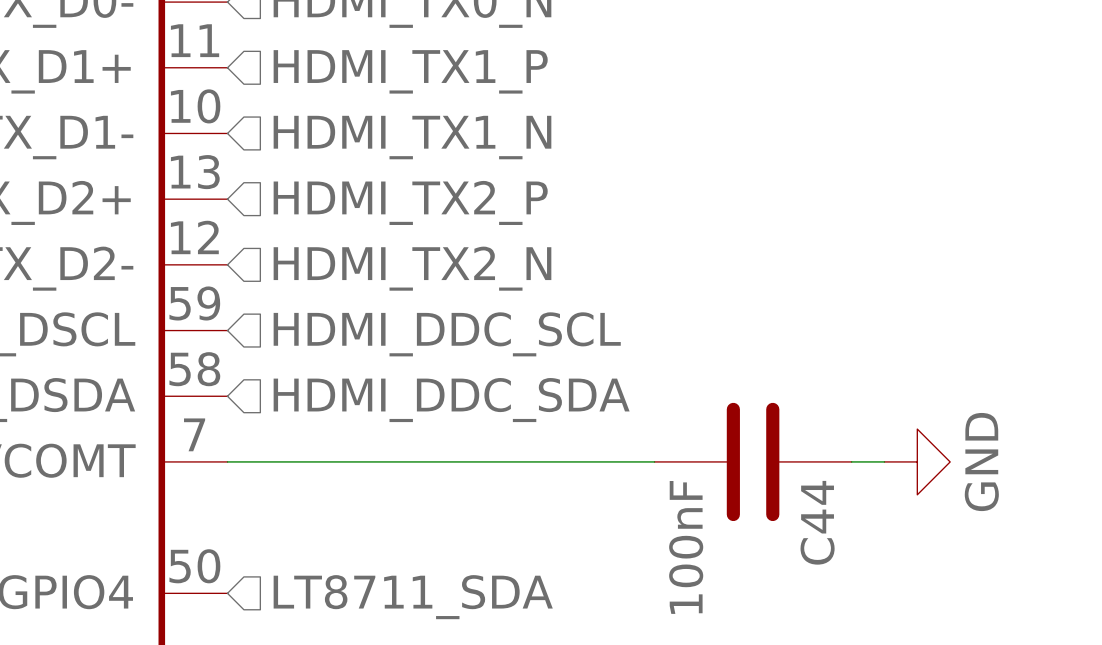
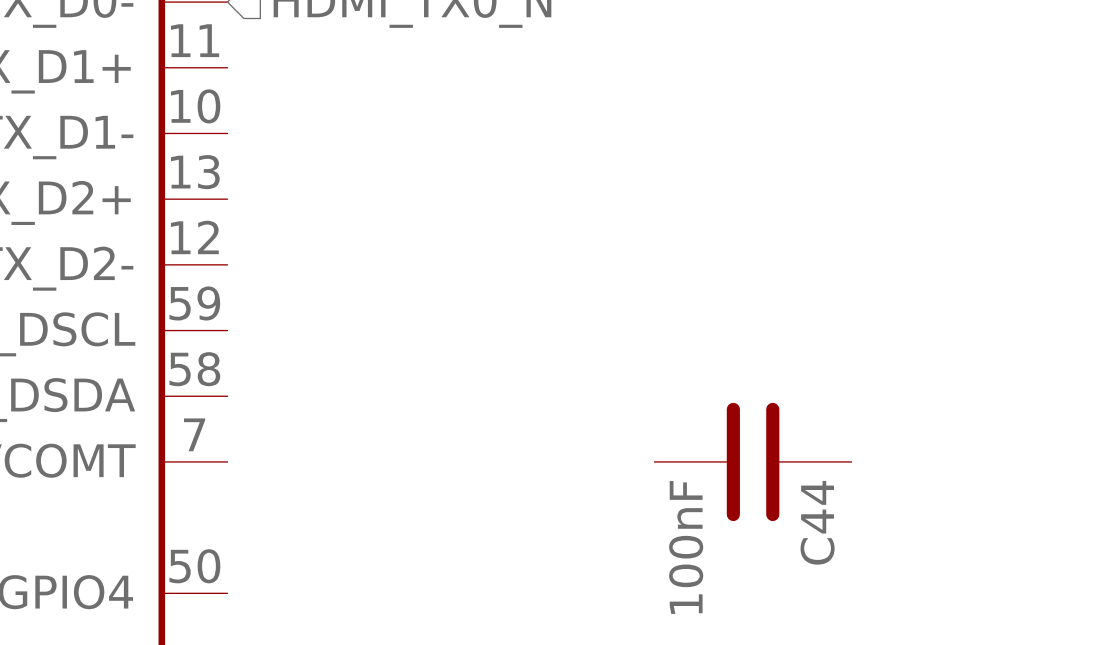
hierarchical label: HDMI_TX1_P (410, 71) -> none
hierarchical label: HDMI_TX1_N (412, 137) -> none
hierarchical label: HDMI_TX2_P (410, 202) -> none
hierarchical label: HDMI_TX2_N (412, 268) -> none
hierarchical label: HDMI_DDC_SCL (447, 334) -> none
hierarchical label: HDMI_DDC_SDA (451, 400) -> none
wire: (227, 461) (654, 461) -> none
wire: (851, 461) (884, 461) -> none
power symbol: GND (917, 461) -> none
hierarchical label: LT8711_SDA (413, 597) -> none

